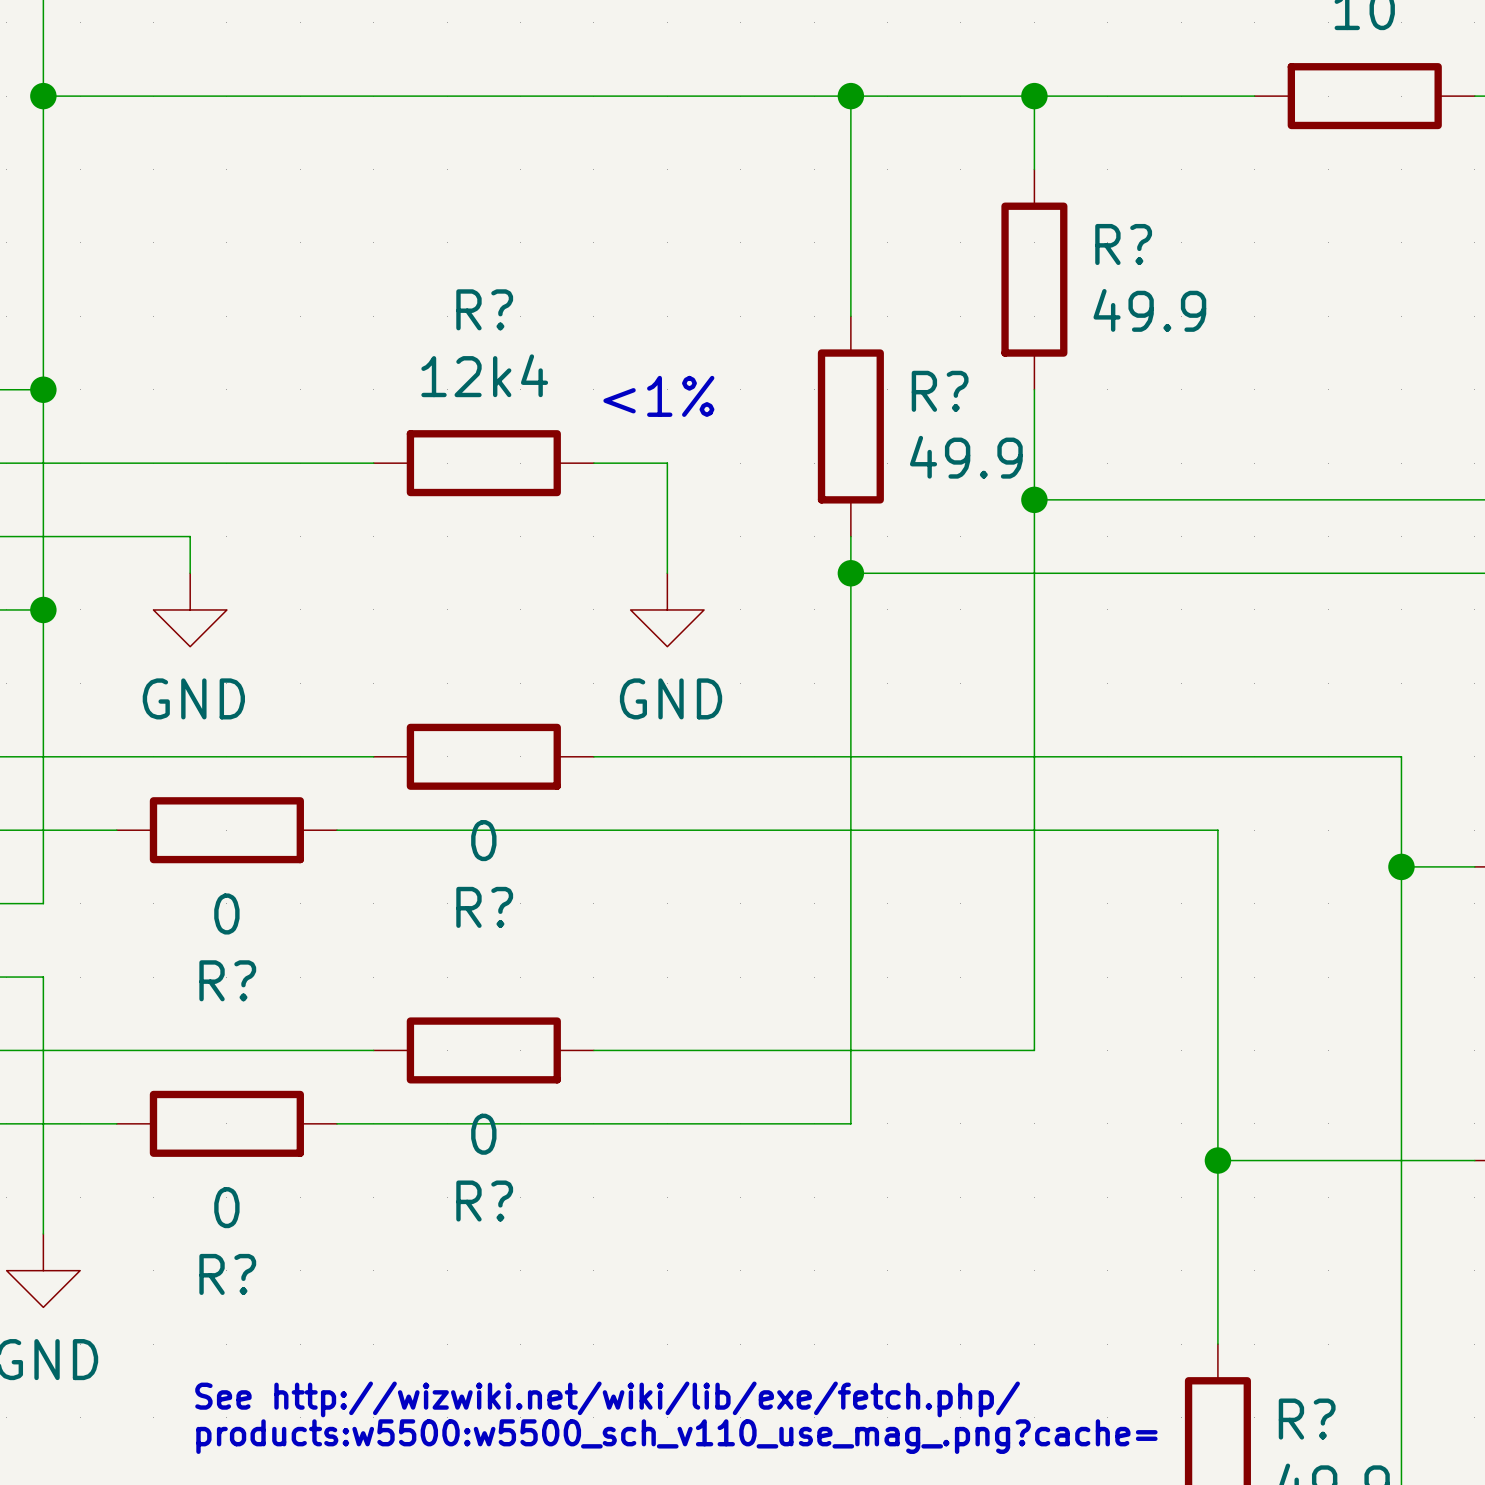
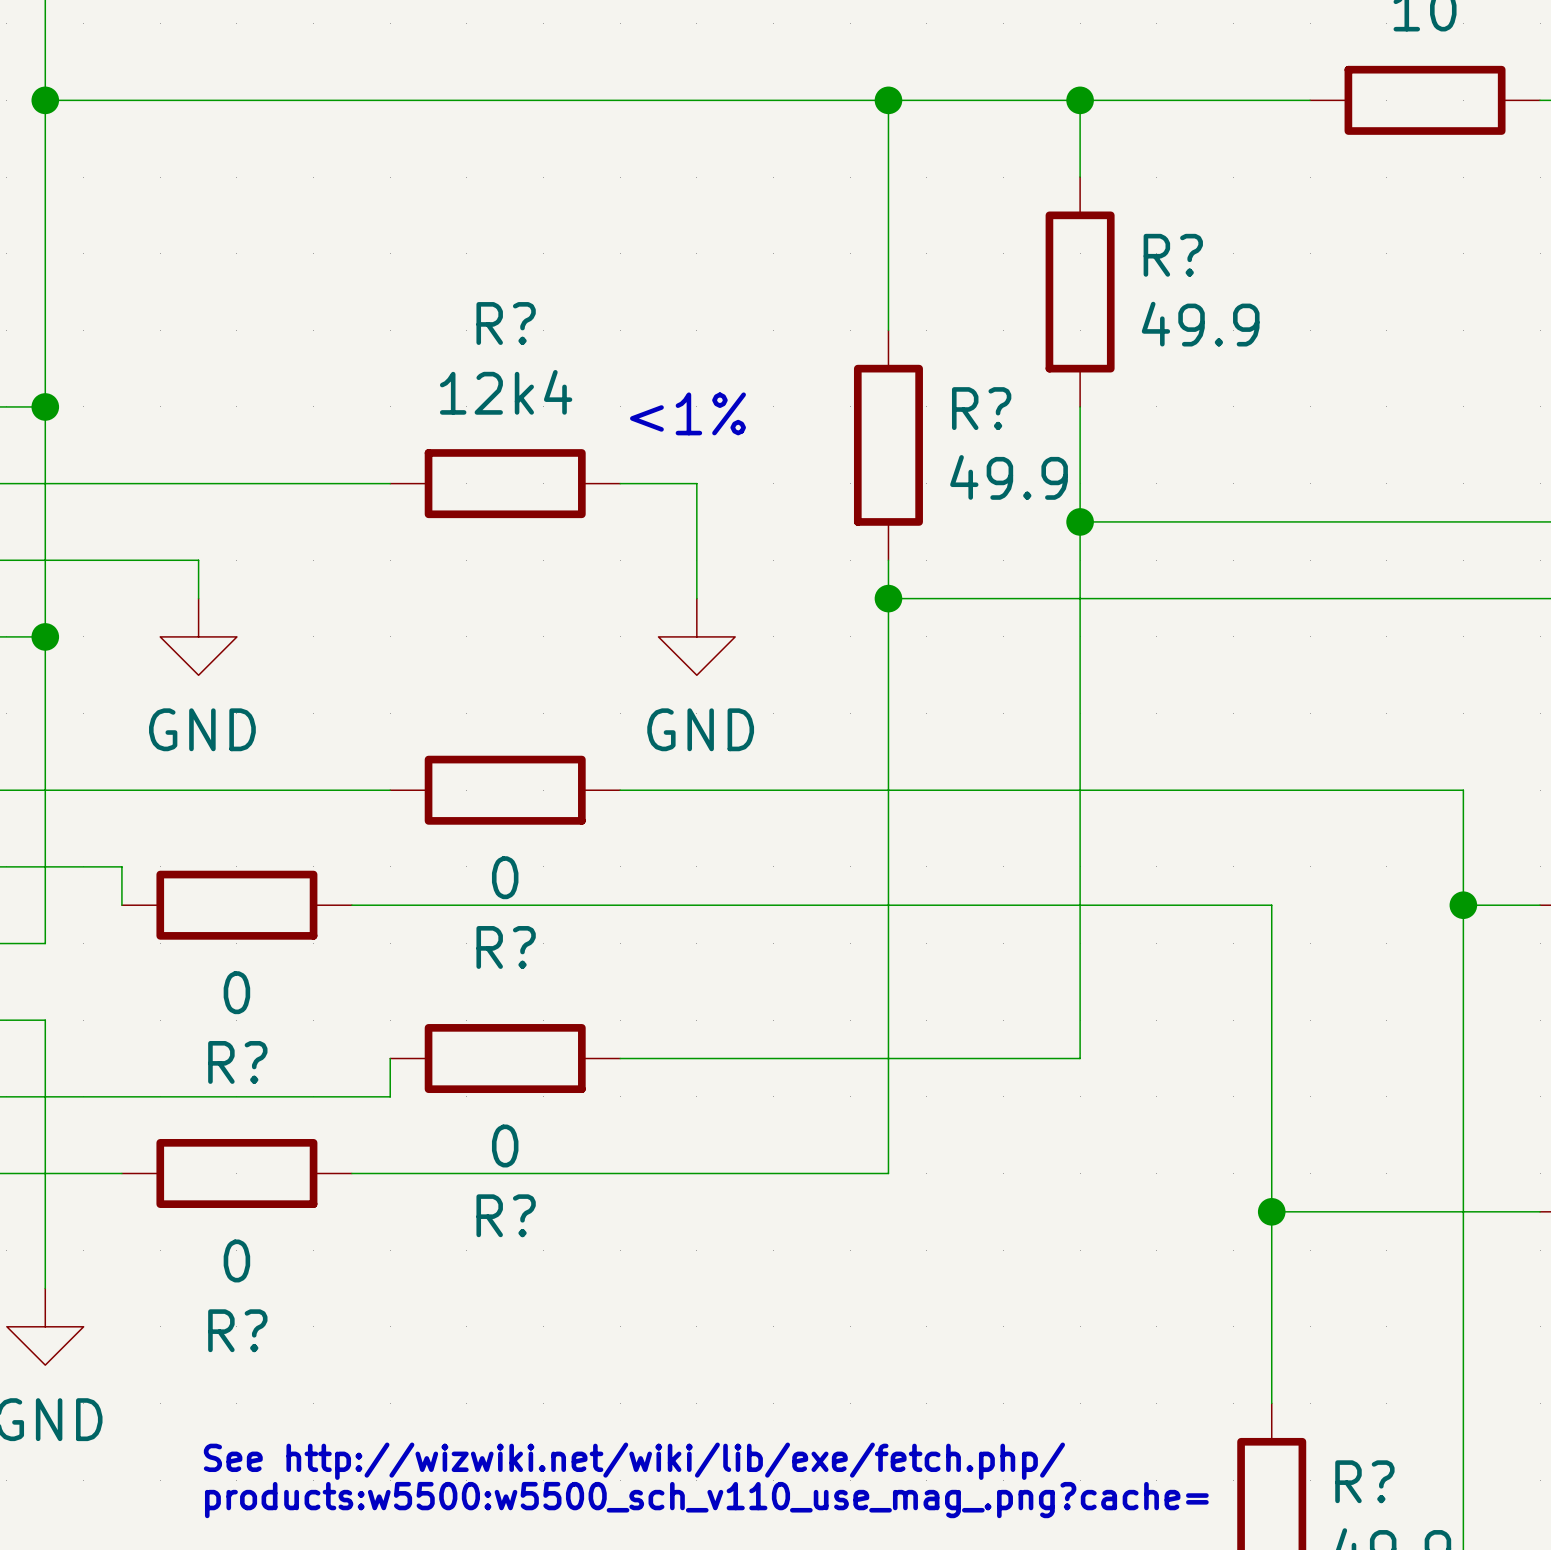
wire: none -> (121, 866) (121, 905)
R? position: (226, 830) -> (236, 905)
wire: (337, 830) (1217, 830) (1217, 866) -> (351, 905) (1271, 905)
wire: none -> (390, 1058) (390, 1096)
wire: (1034, 1013) (1034, 1050) (593, 1050) -> (1080, 1058) (620, 1058)
R? position: (483, 1050) -> (505, 1058)

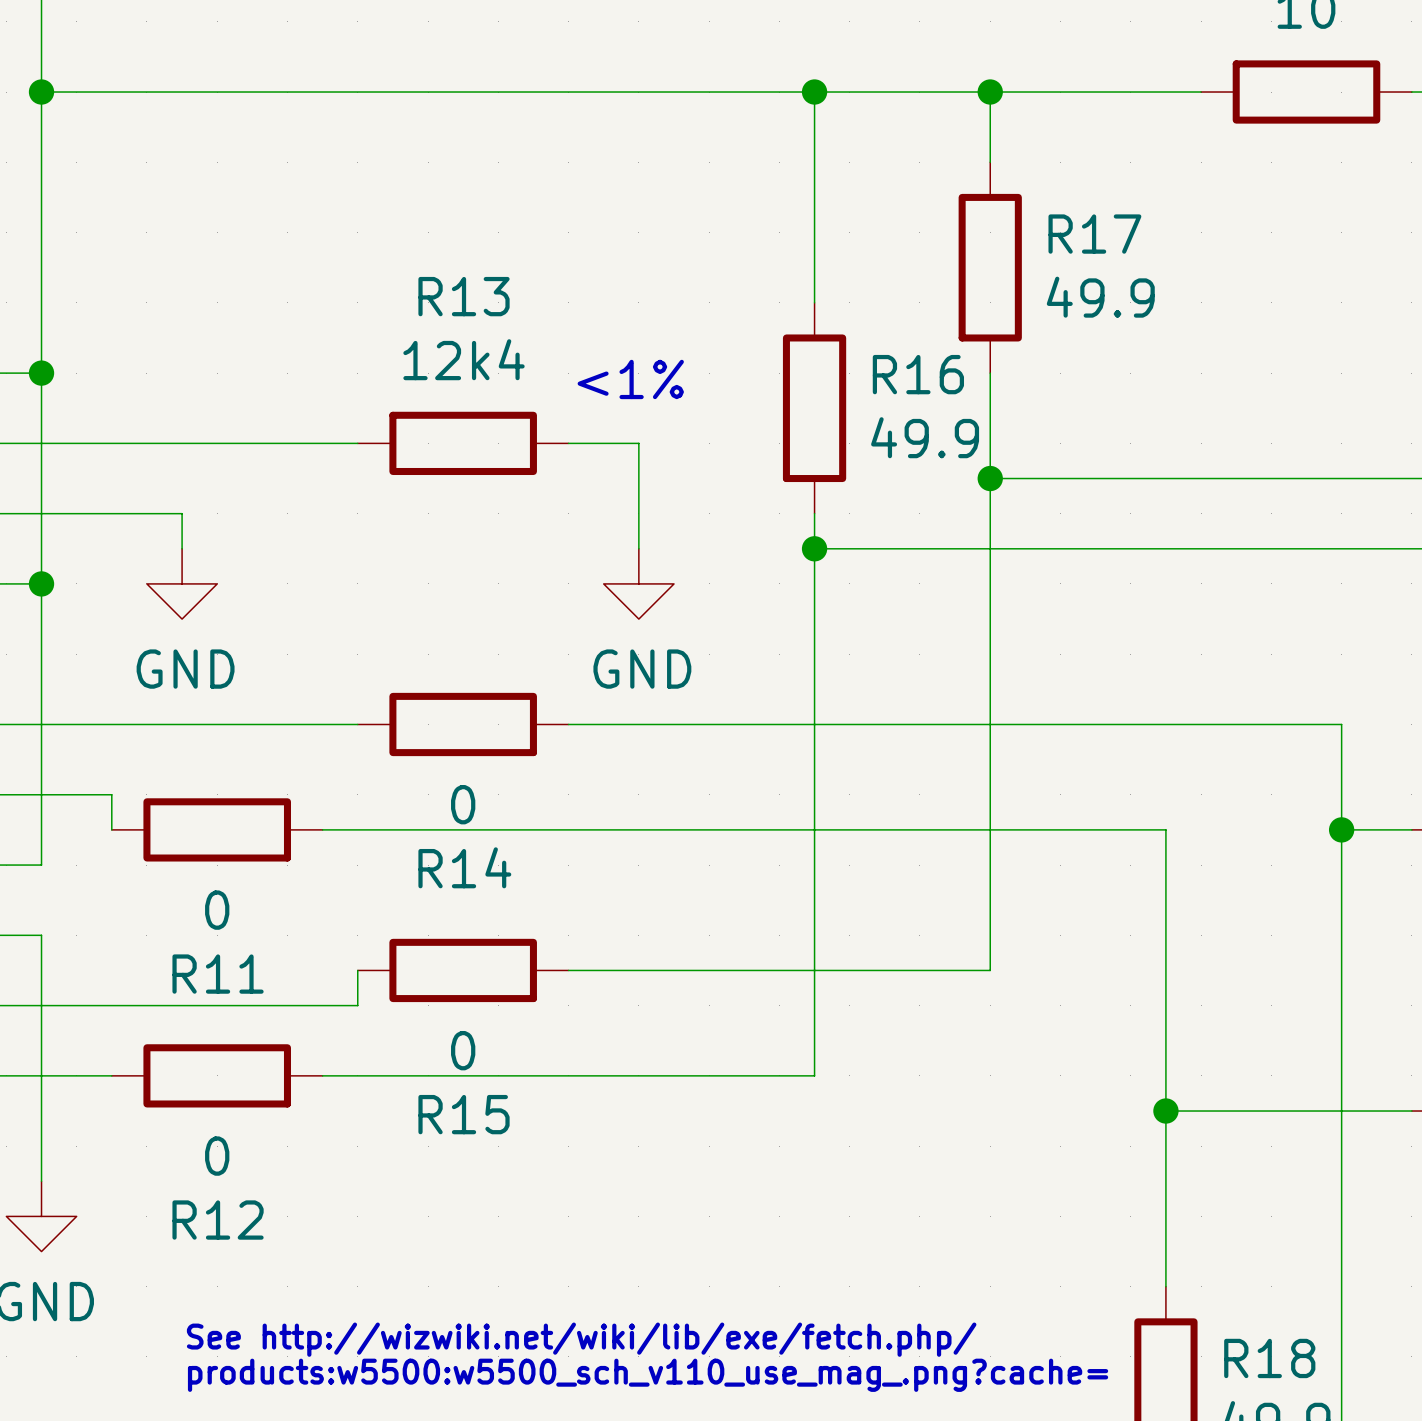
R? name: R? (1173, 255) -> R17 (1094, 234)
R? name: R? (506, 323) -> R13 (464, 296)
R? name: R? (981, 408) -> R16 (918, 374)
R? name: R? (506, 947) -> R14 (464, 867)
R? name: R? (237, 1062) -> R11 (218, 974)
R? name: R? (506, 1215) -> R15 (464, 1114)
R? name: R? (237, 1330) -> R12 (218, 1220)
R? name: R? (1364, 1481) -> R18 (1269, 1358)

